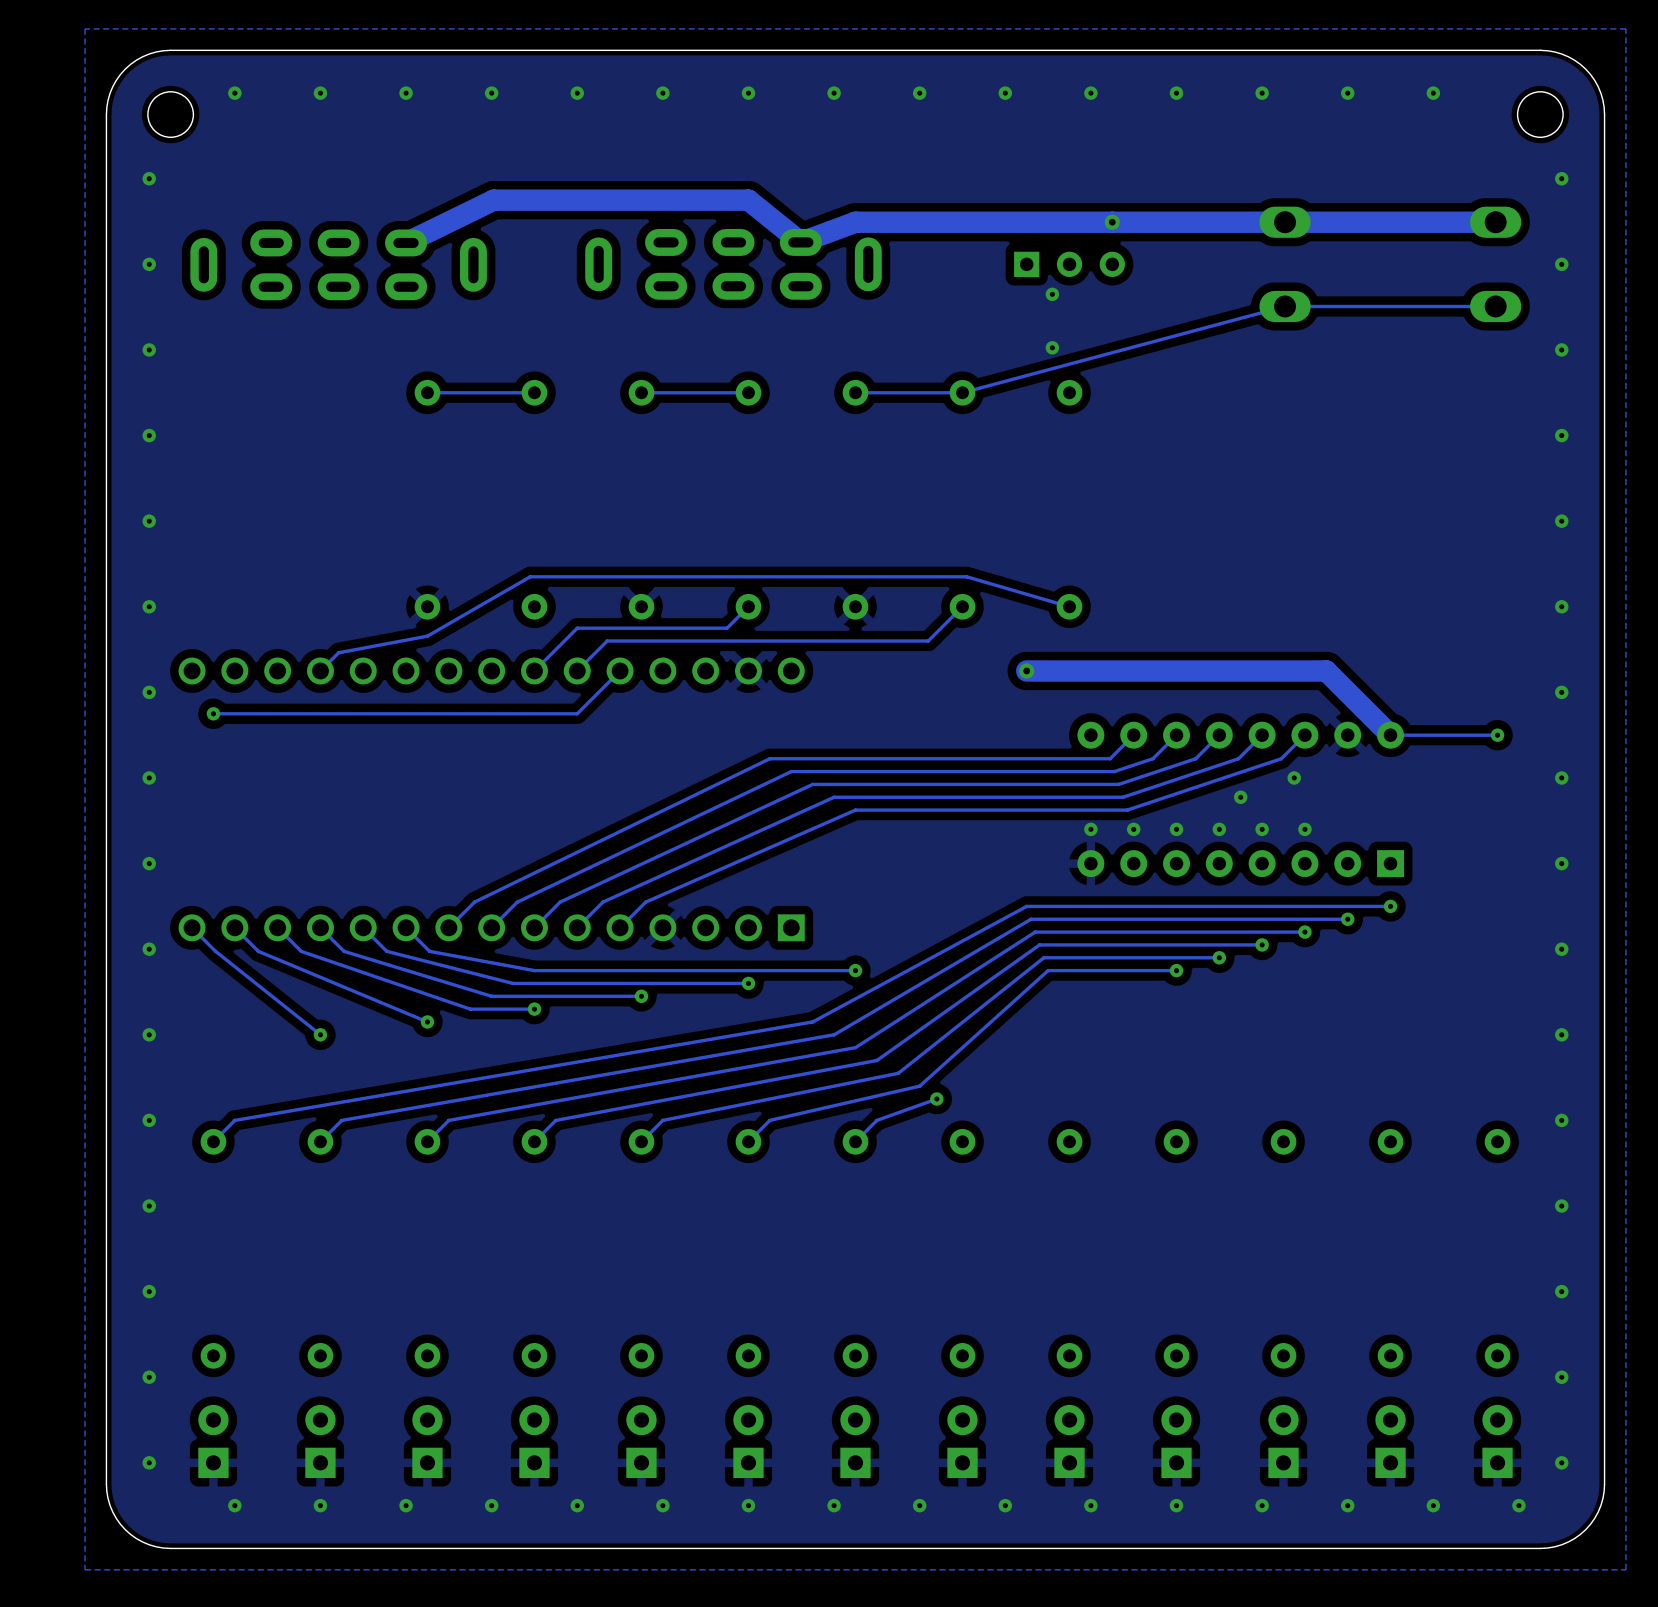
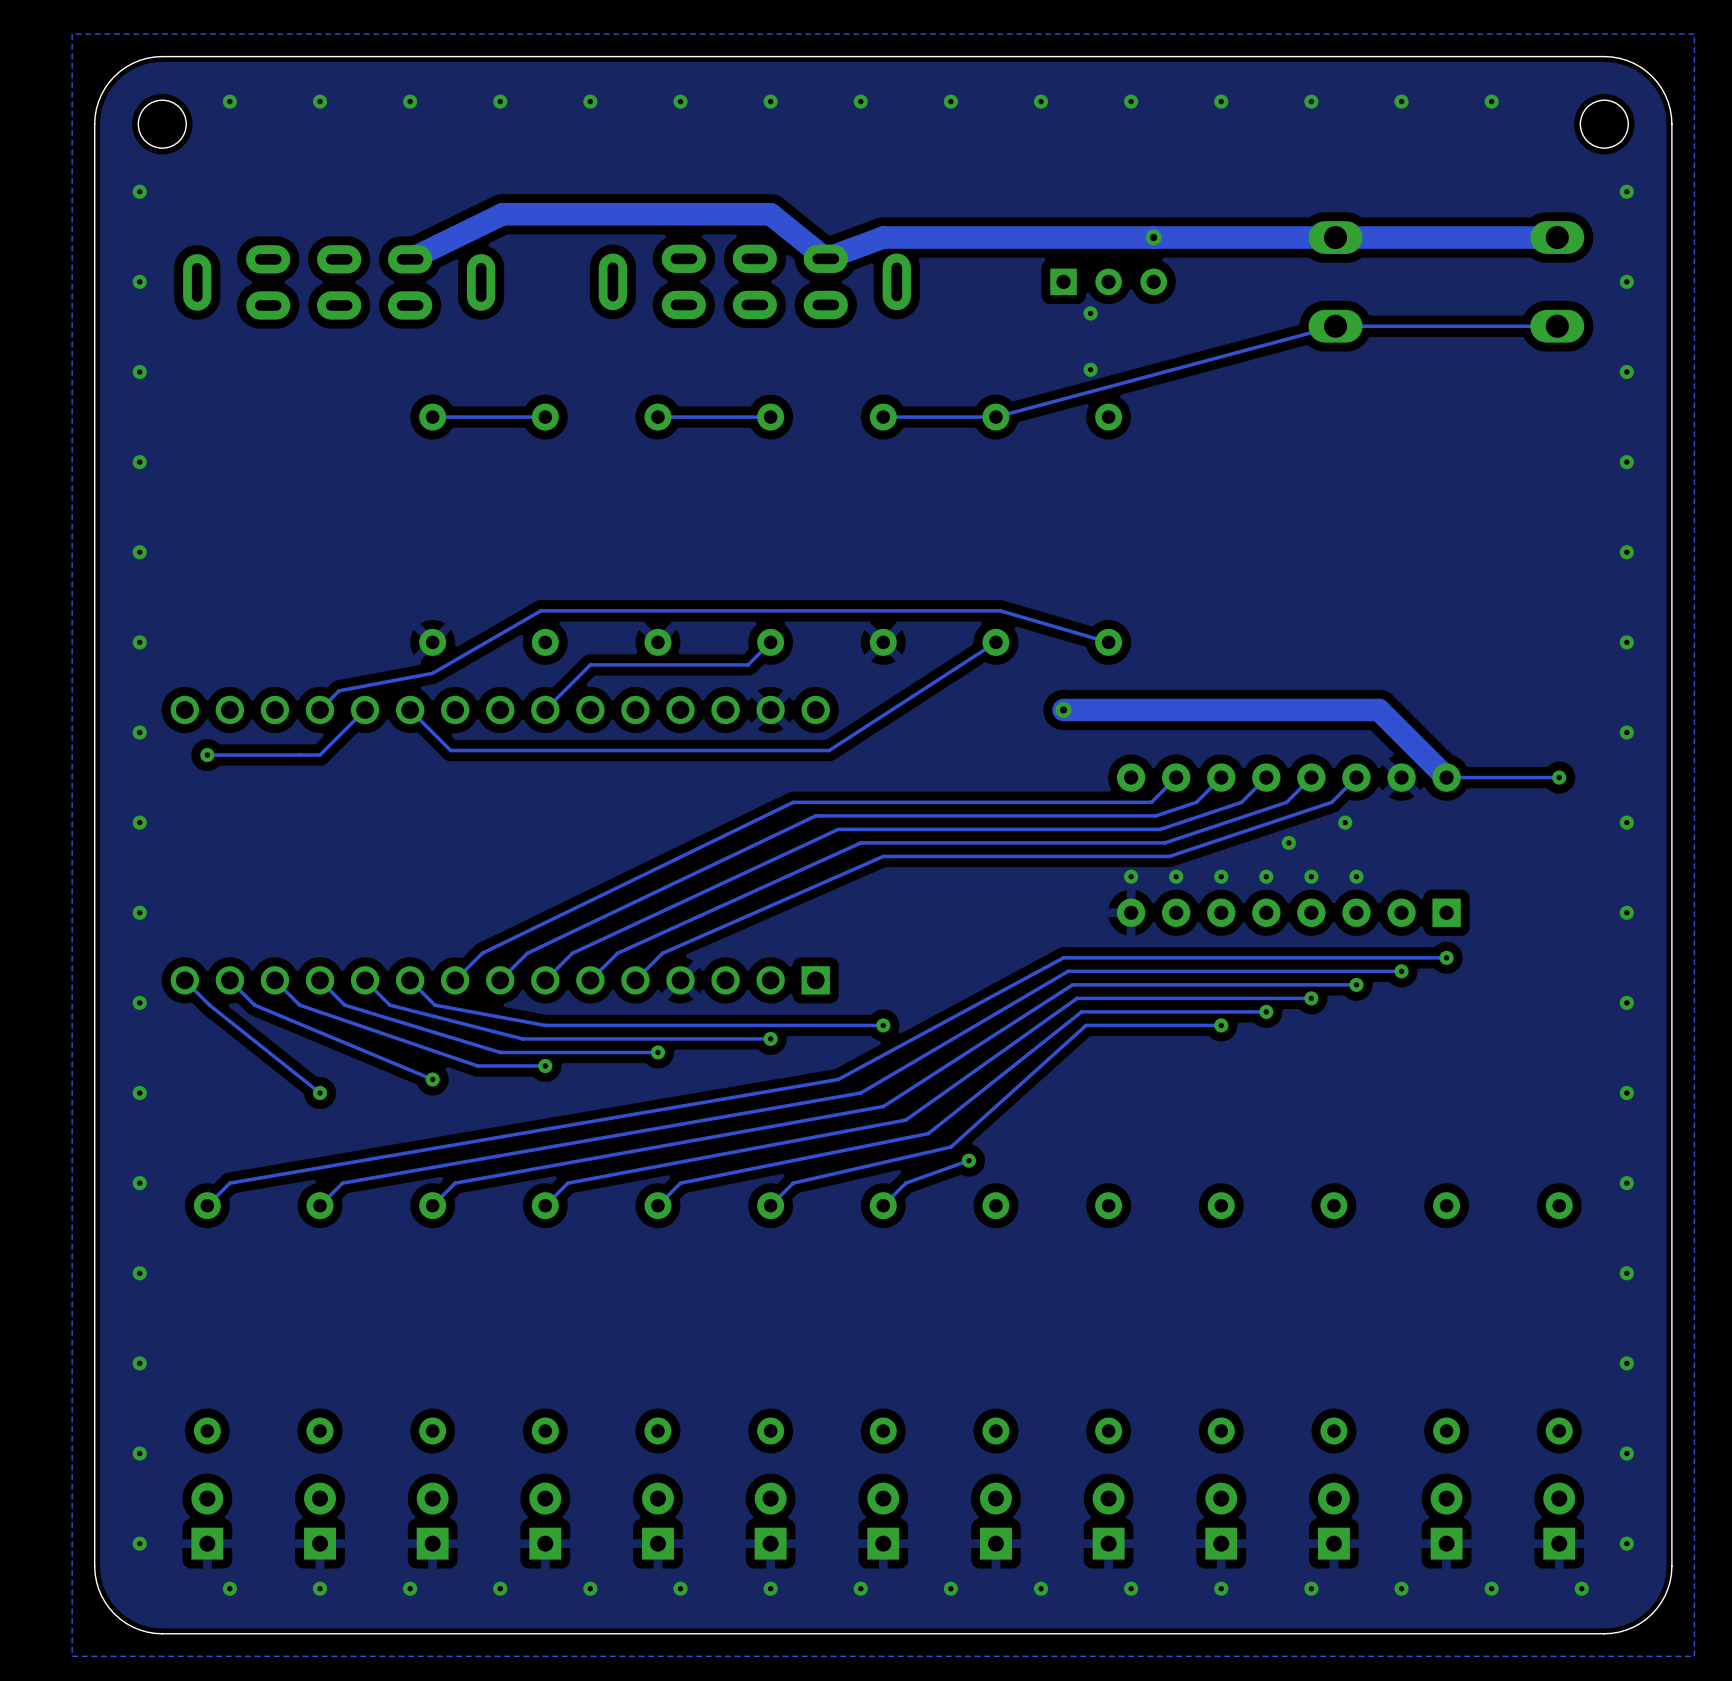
track: (962, 606) (928, 641) (607, 641) (577, 670) -> (995, 642) (829, 750) (450, 750) (410, 709)
track: (620, 670) (577, 713) (320, 713) -> (365, 709) (320, 755)

